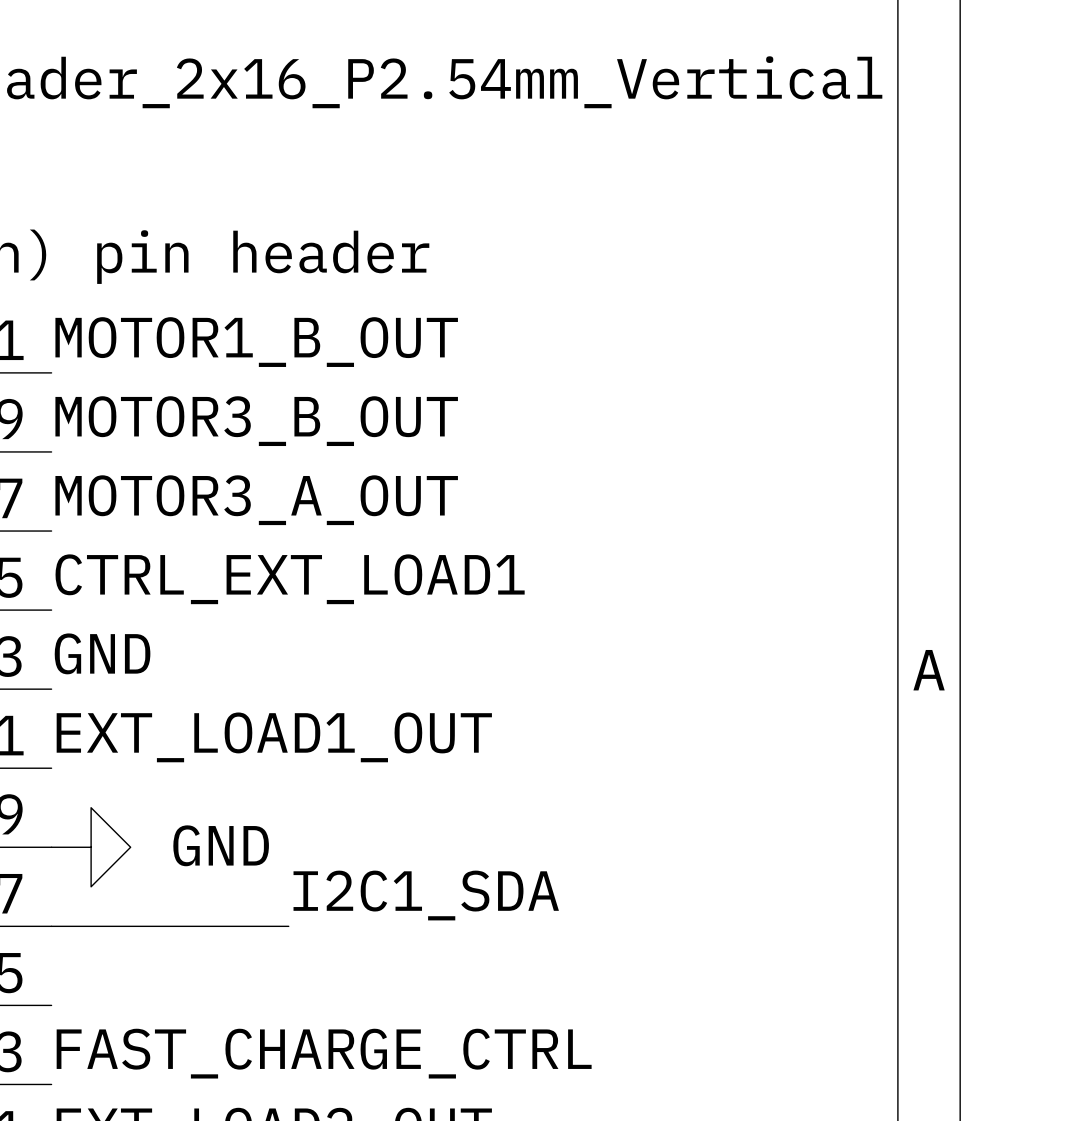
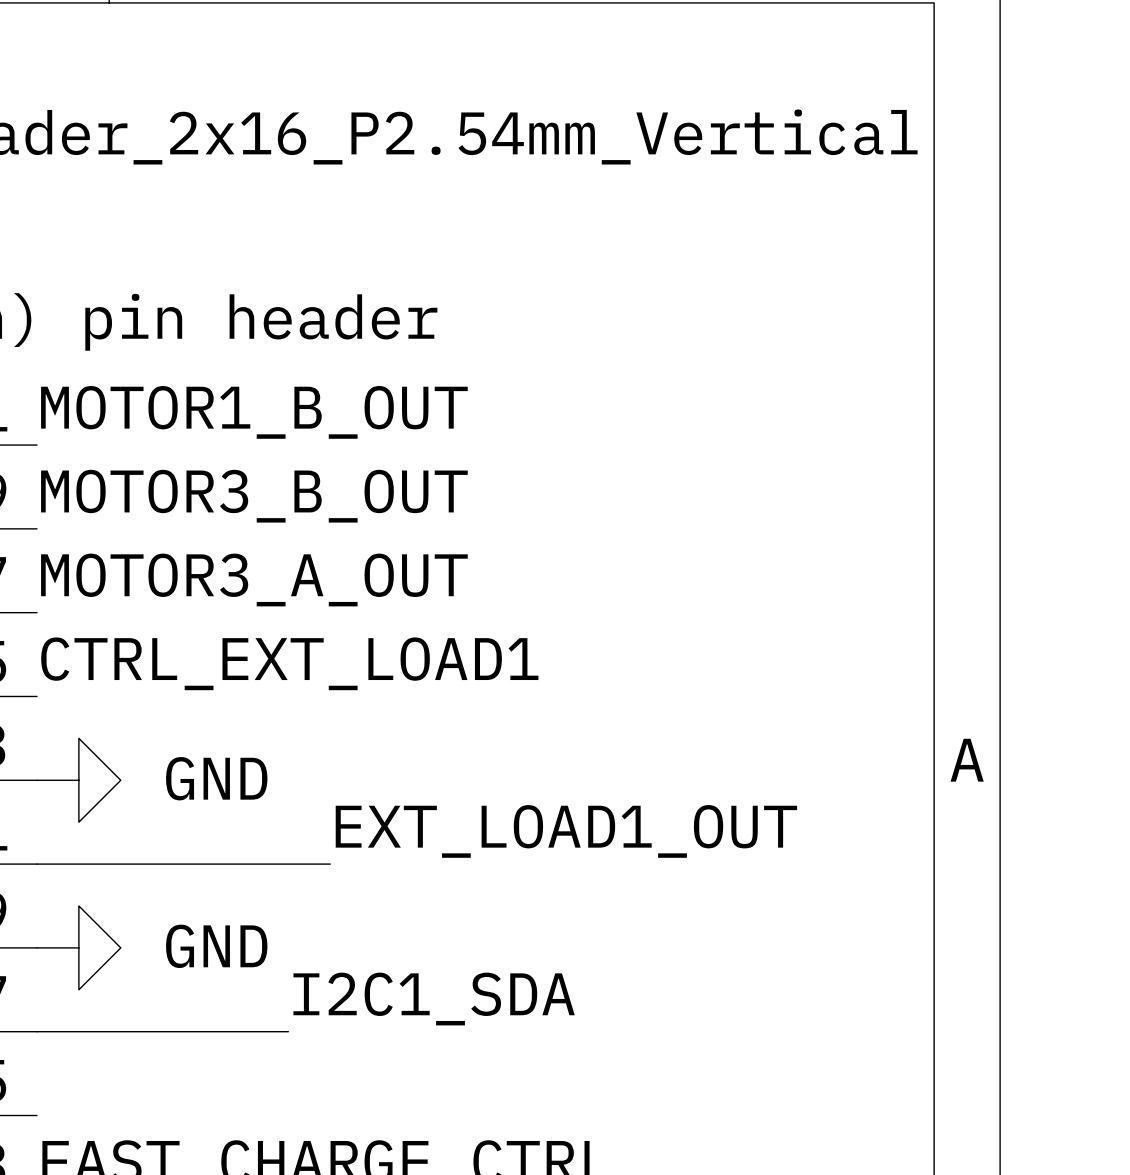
label: GND (102, 653) -> none
power symbol: none -> GND (78, 780)
label position: EXT_LOAD1_OUT (274, 737) -> EXT_LOAD1_OUT (566, 831)
wire: none -> (36, 864) (330, 864)

